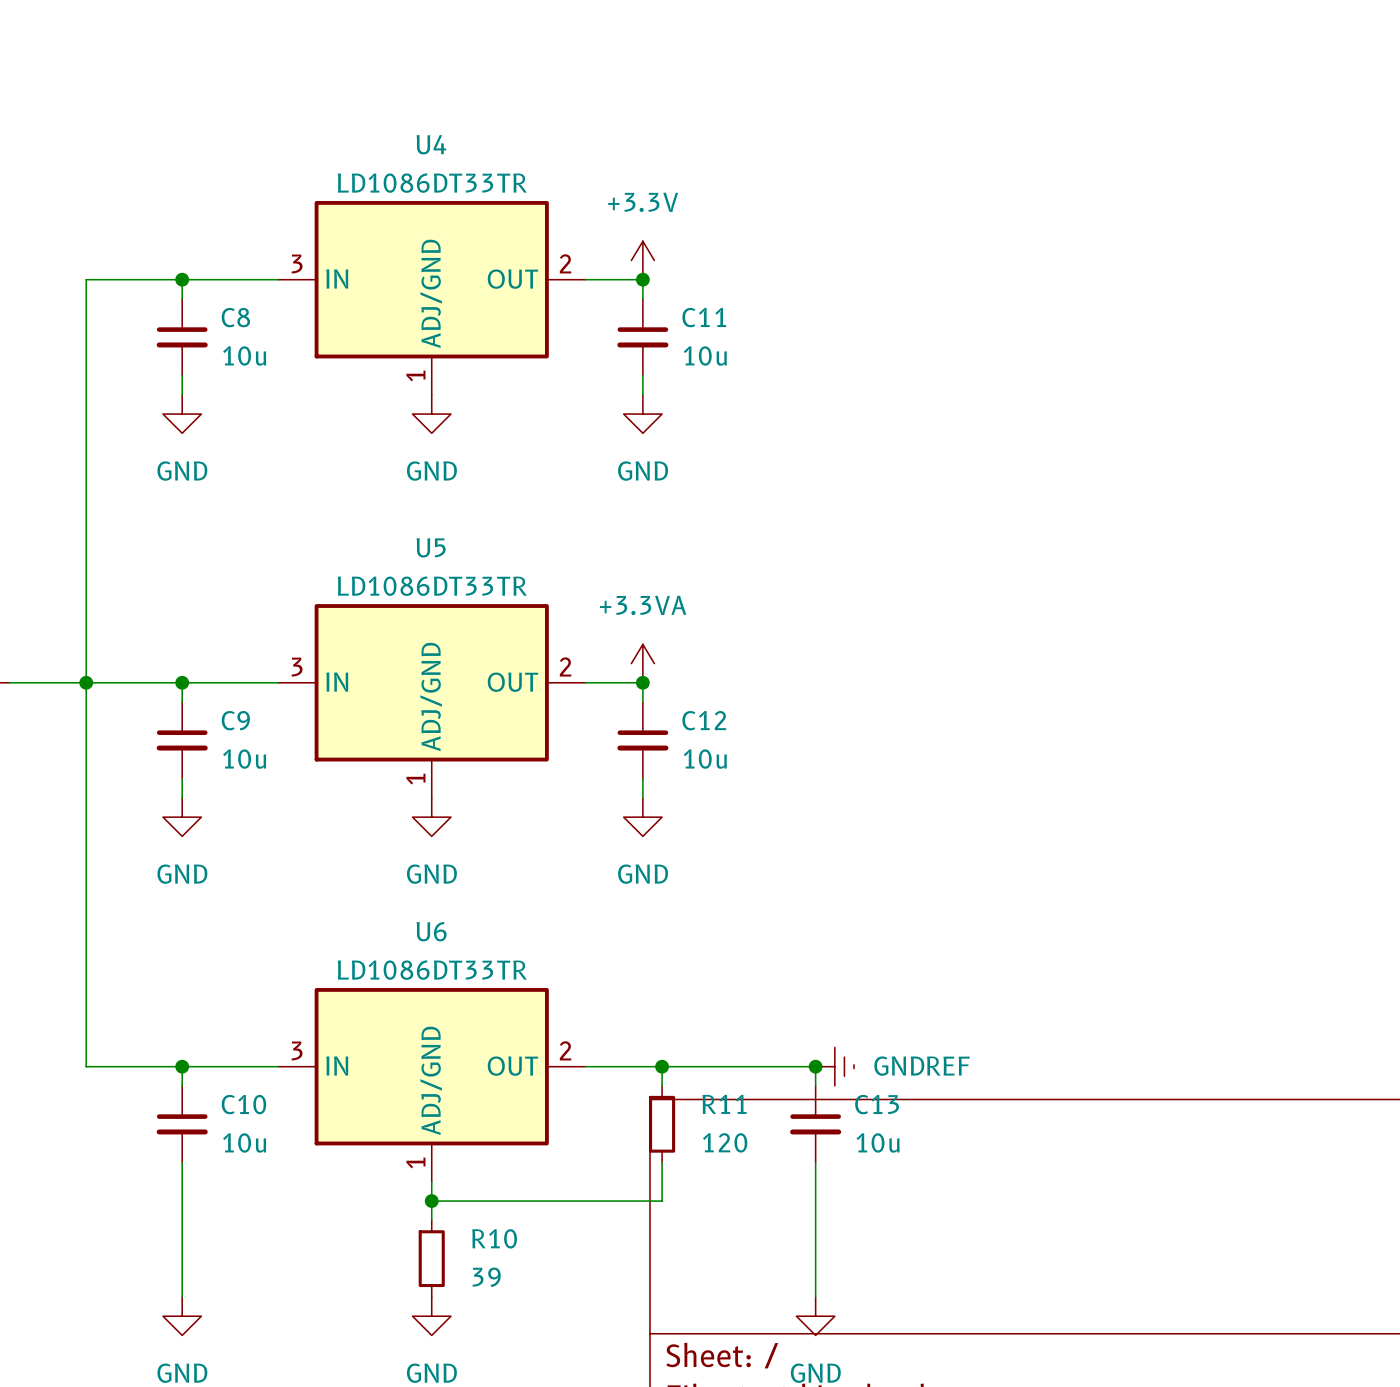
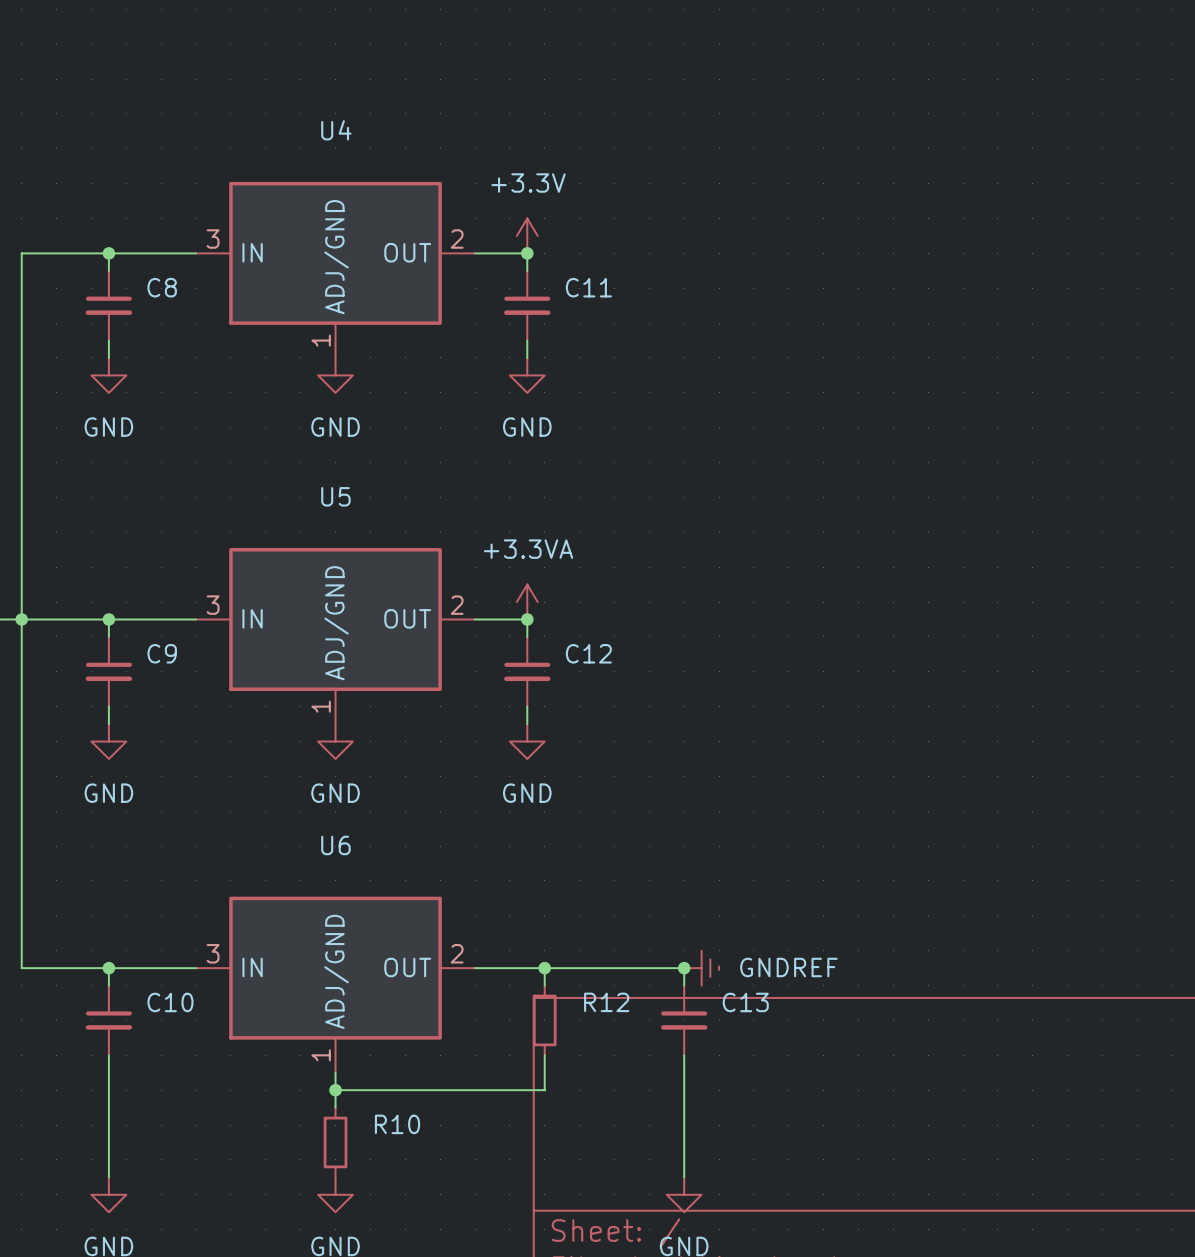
U4 value: LD1086DT33TR (432, 183) -> none
C8 value: 10u (244, 355) -> none
C11 value: 10u (705, 355) -> none
U5 value: LD1086DT33TR (432, 586) -> none
C9 value: 10u (244, 759) -> none
C12 value: 10u (705, 759) -> none
U6 value: LD1086DT33TR (432, 970) -> none
R11 name: R11 (724, 1104) -> R12 (606, 1002)
C10 value: 10u (244, 1142) -> none
R11 value: 120 (725, 1142) -> none
C13 value: 10u (878, 1142) -> none
R10 value: 39 (486, 1277) -> none

